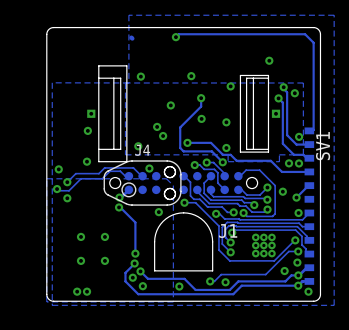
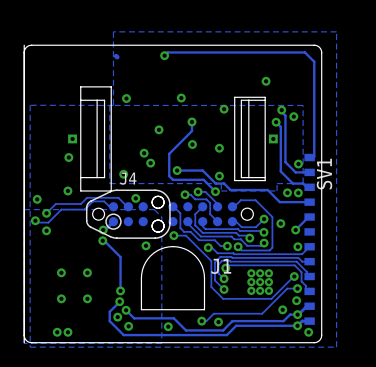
board edge: none -> (24, 45) (24, 342)

